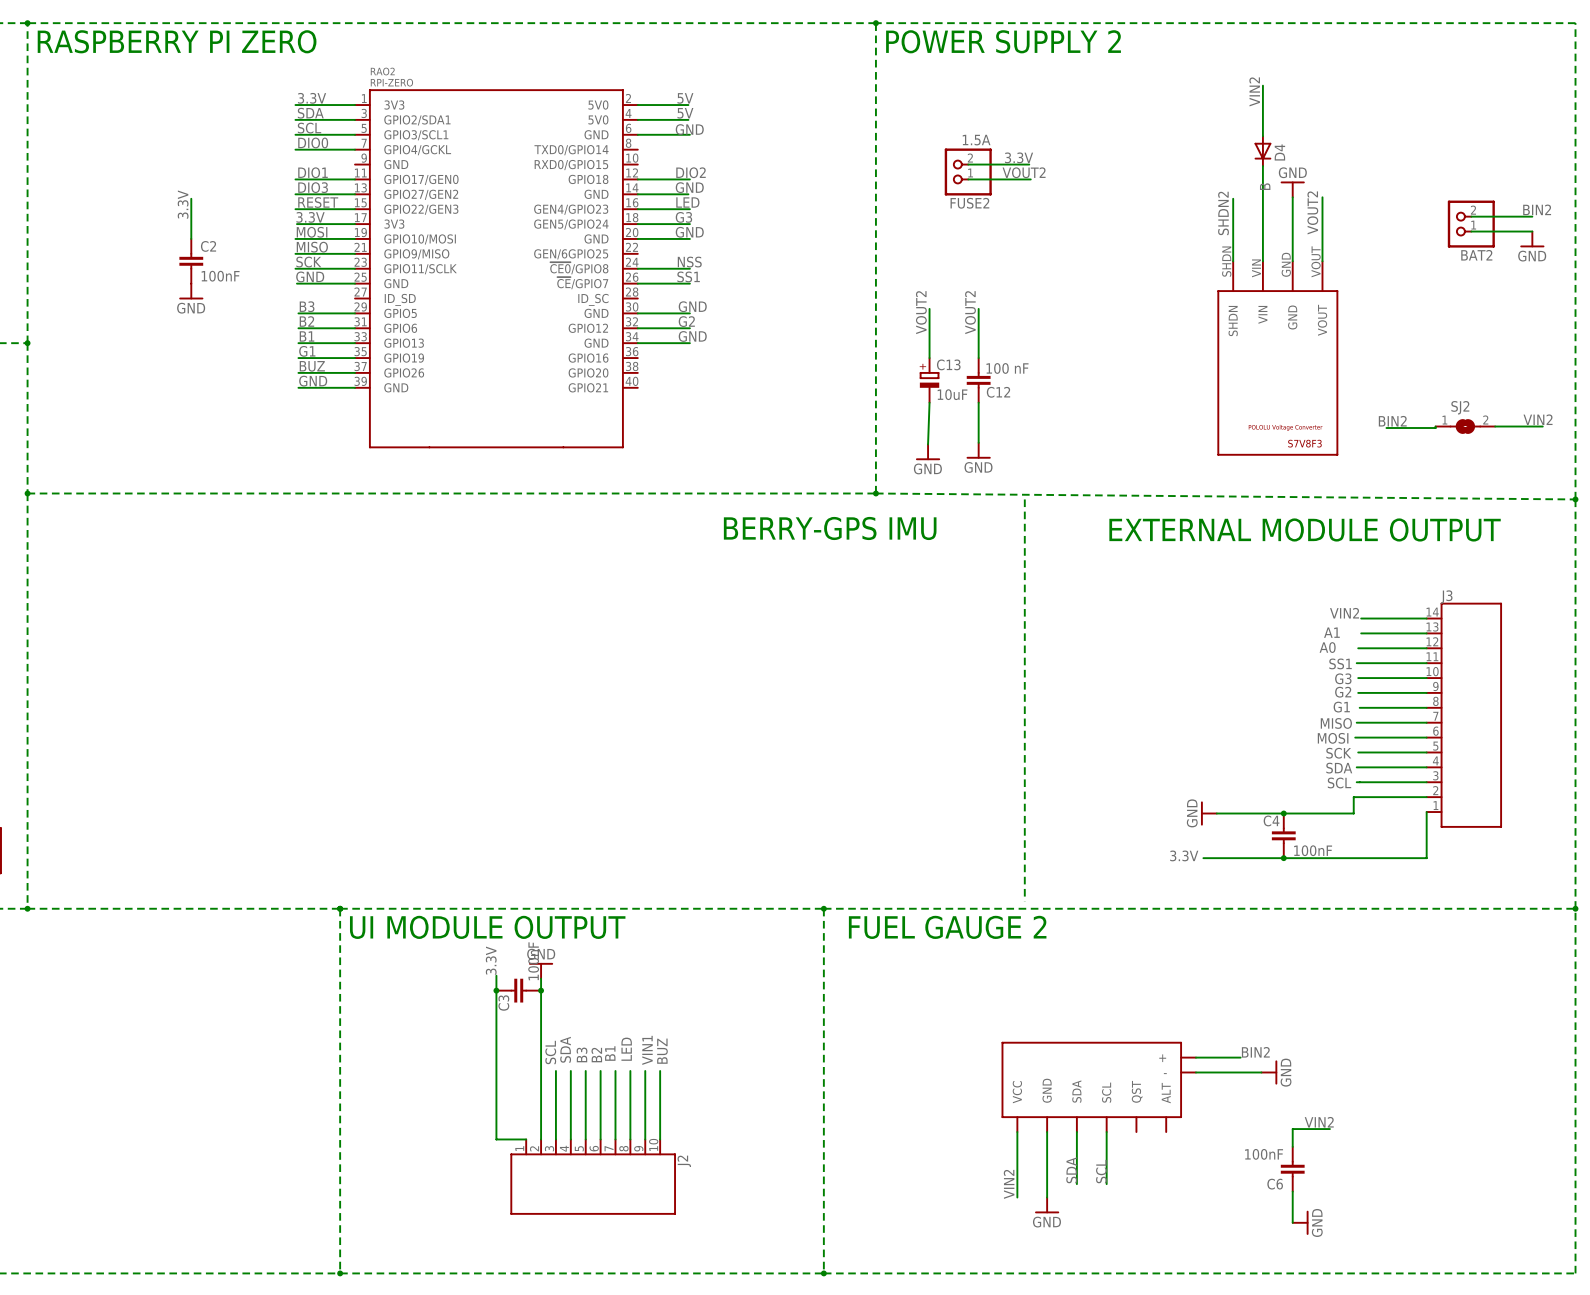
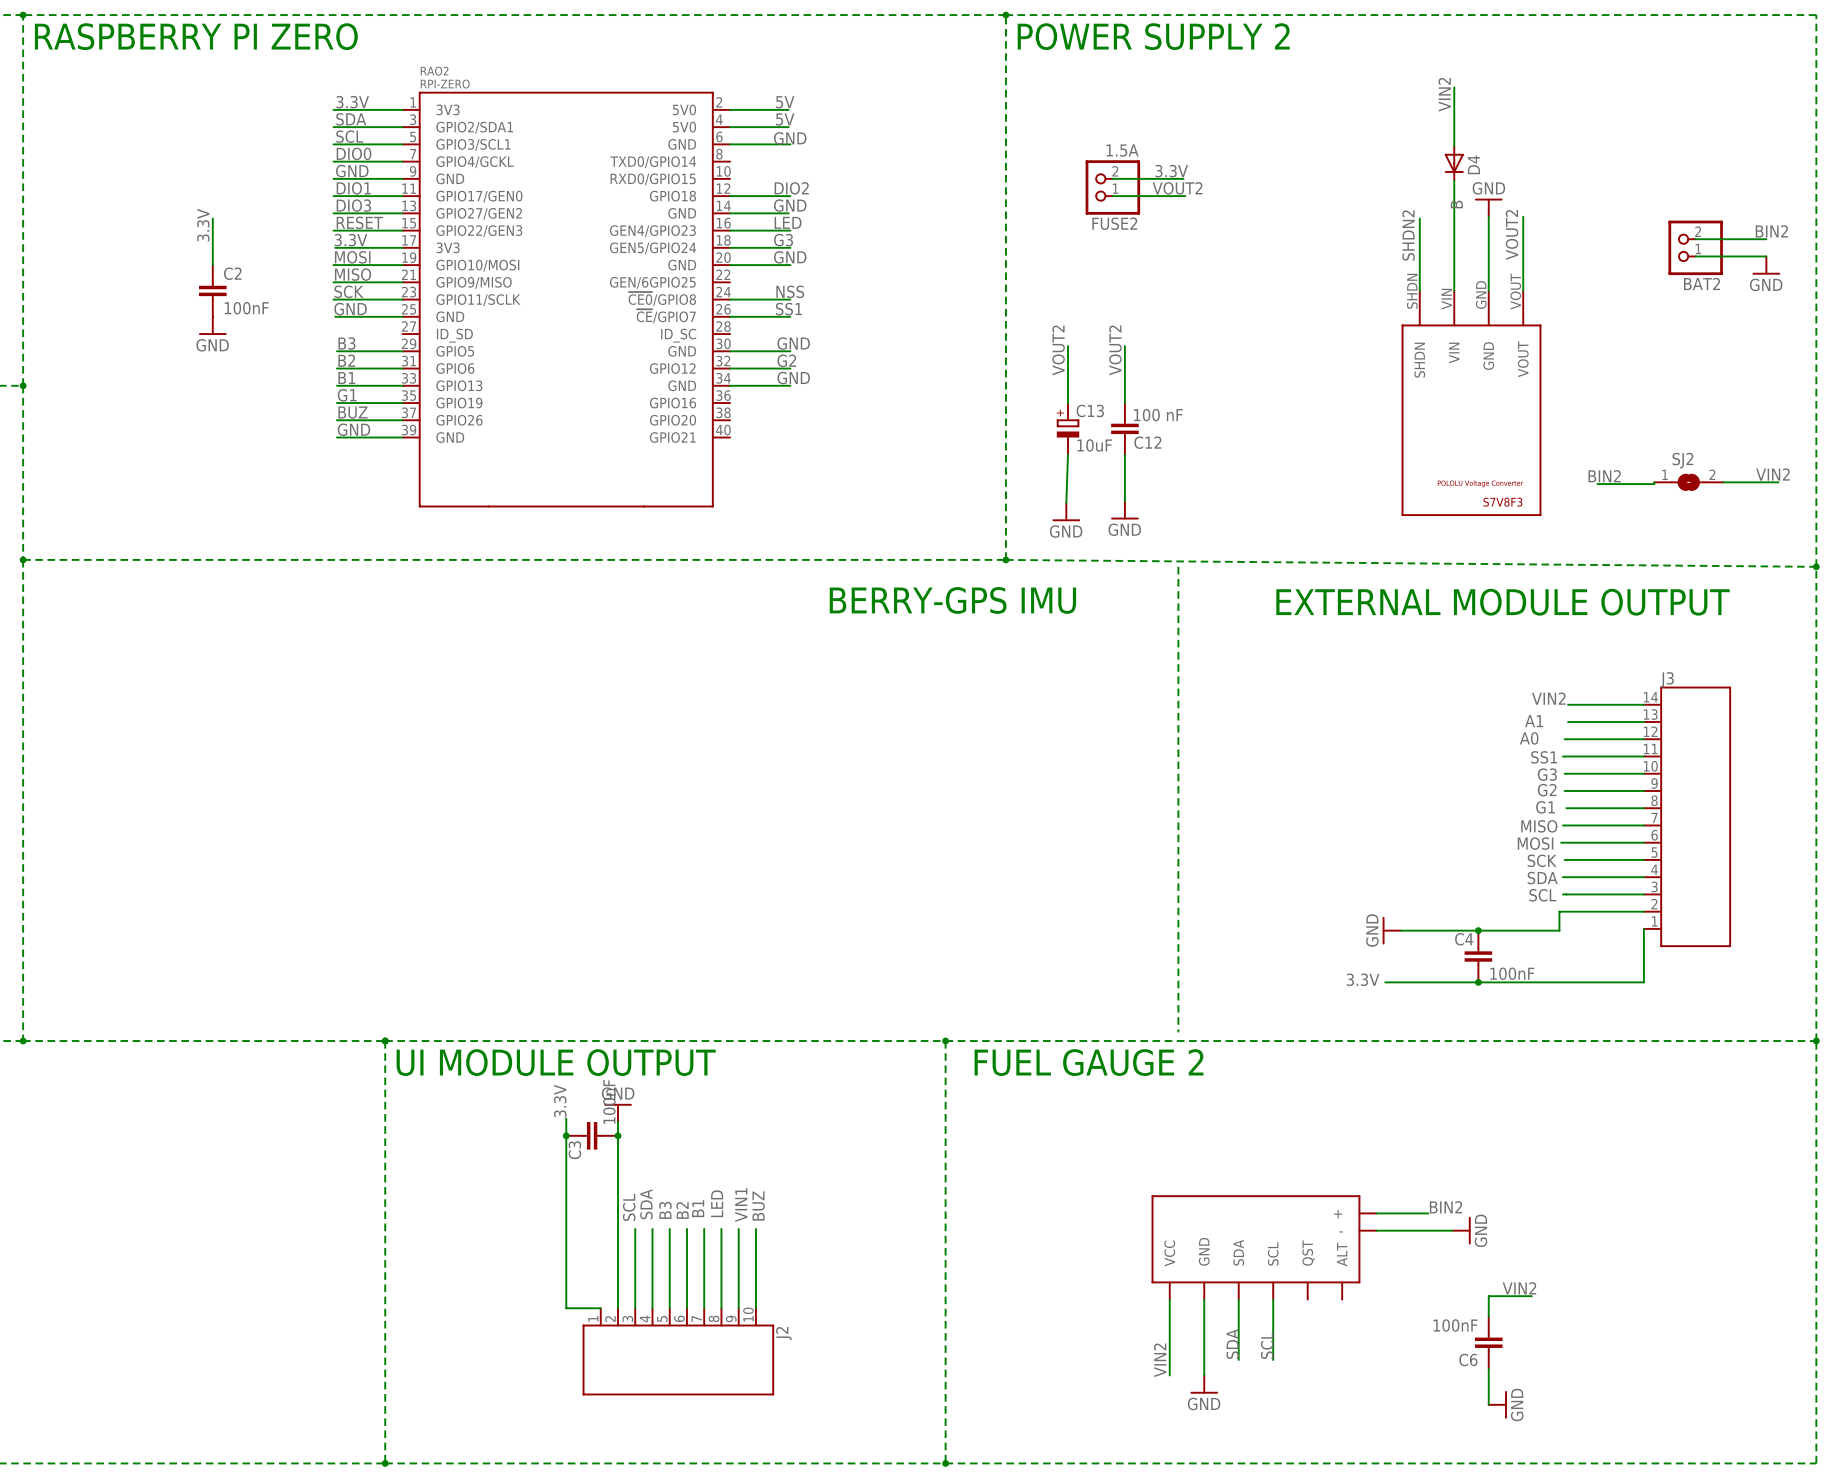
label: none -> GND (352, 171)
wire: none -> (333, 178) (402, 178)

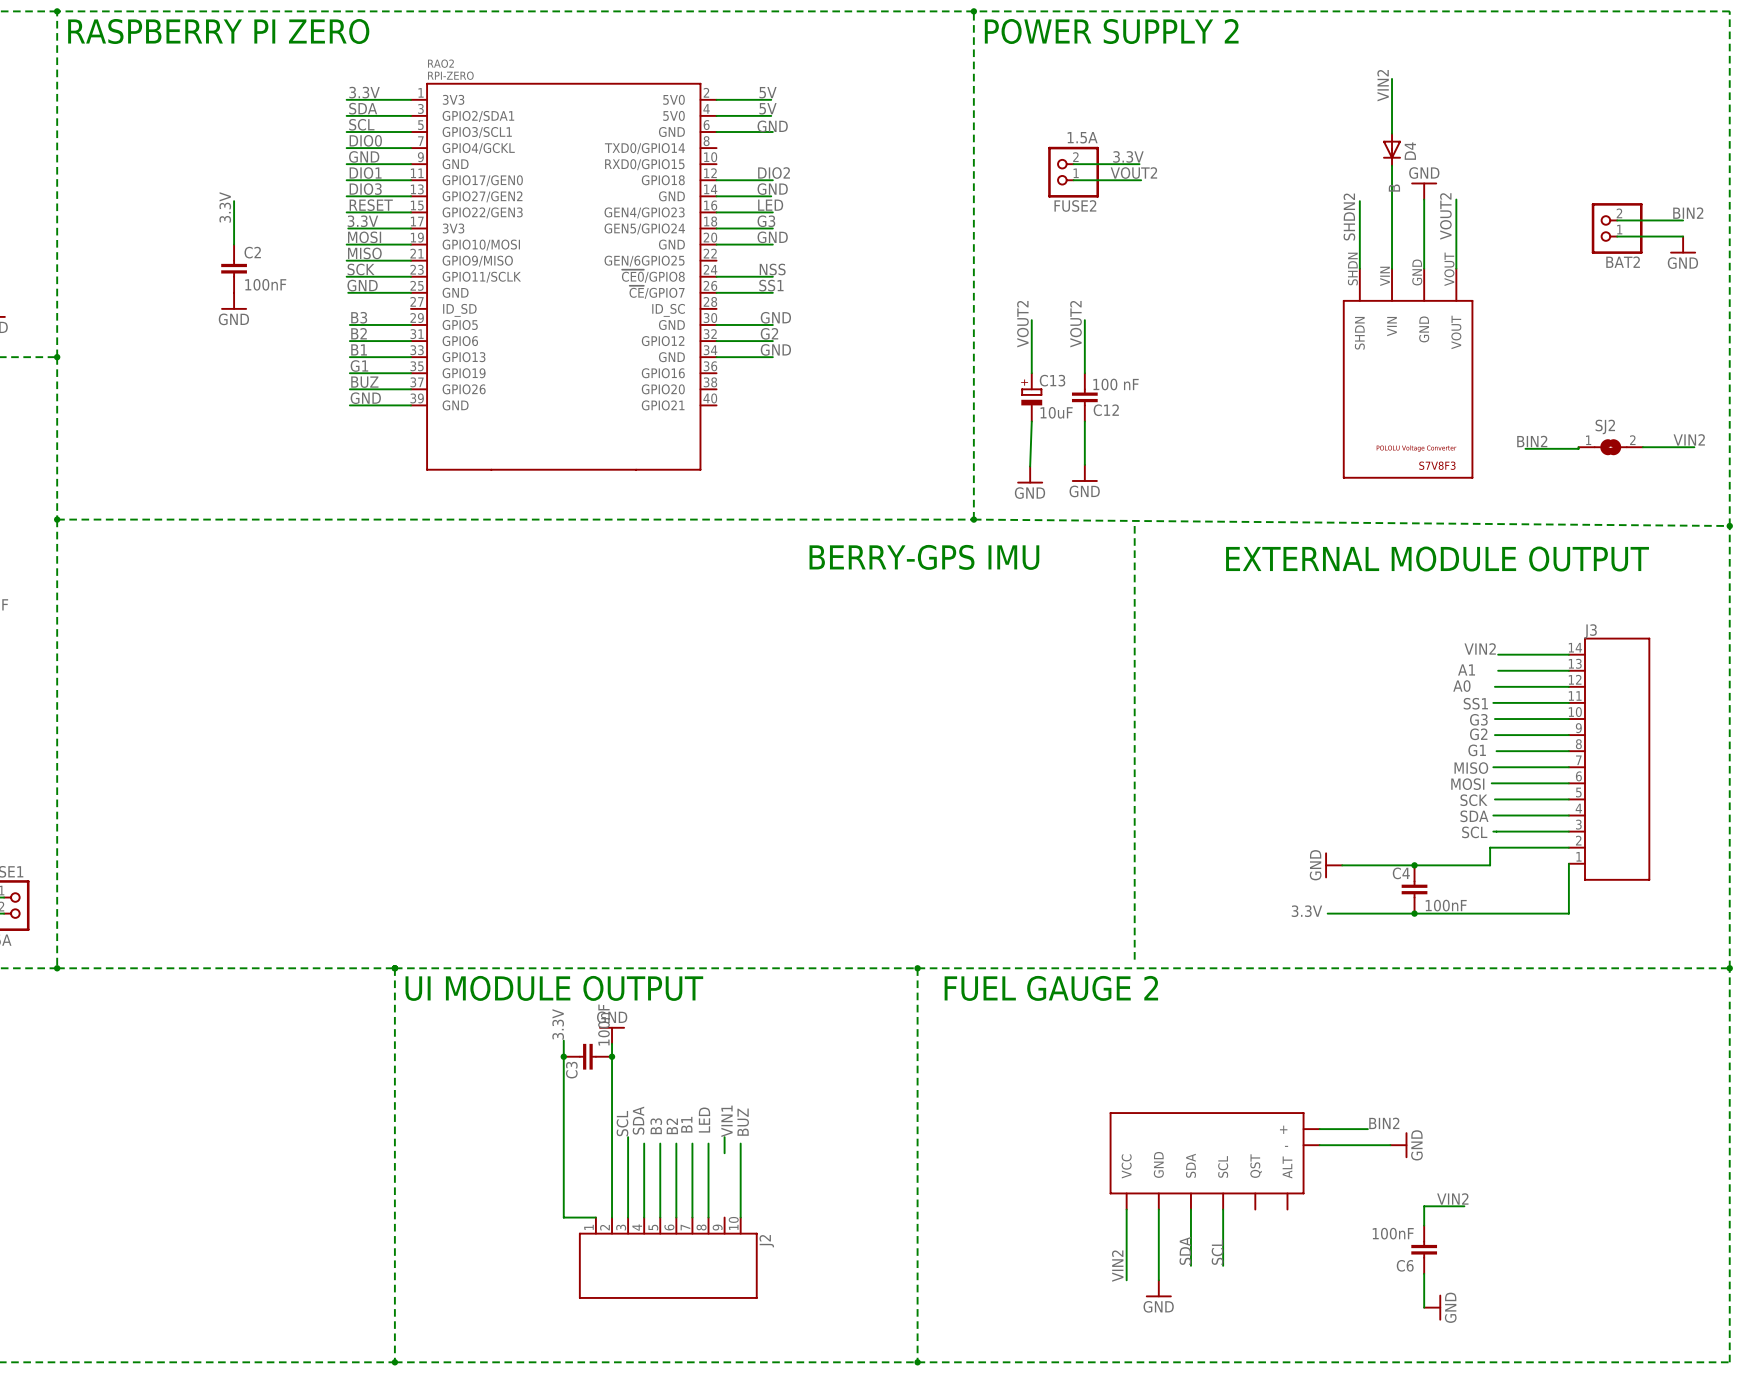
wire: none -> (628, 1137) (628, 1143)
wire: none -> (724, 1137) (724, 1143)
wire: (738, 1239) (738, 1308) -> none

